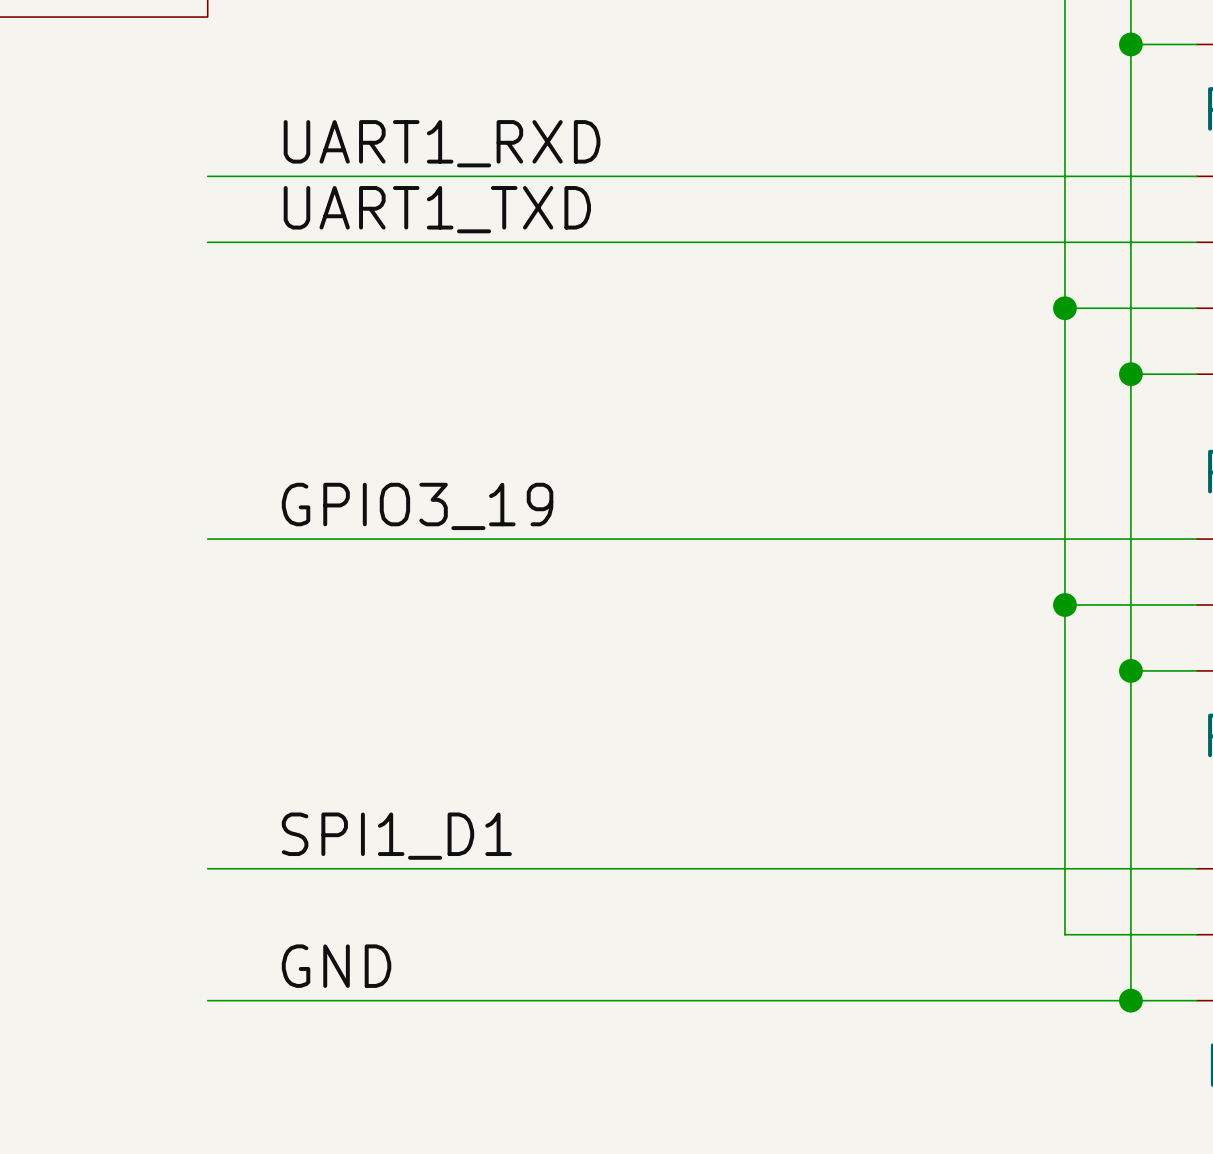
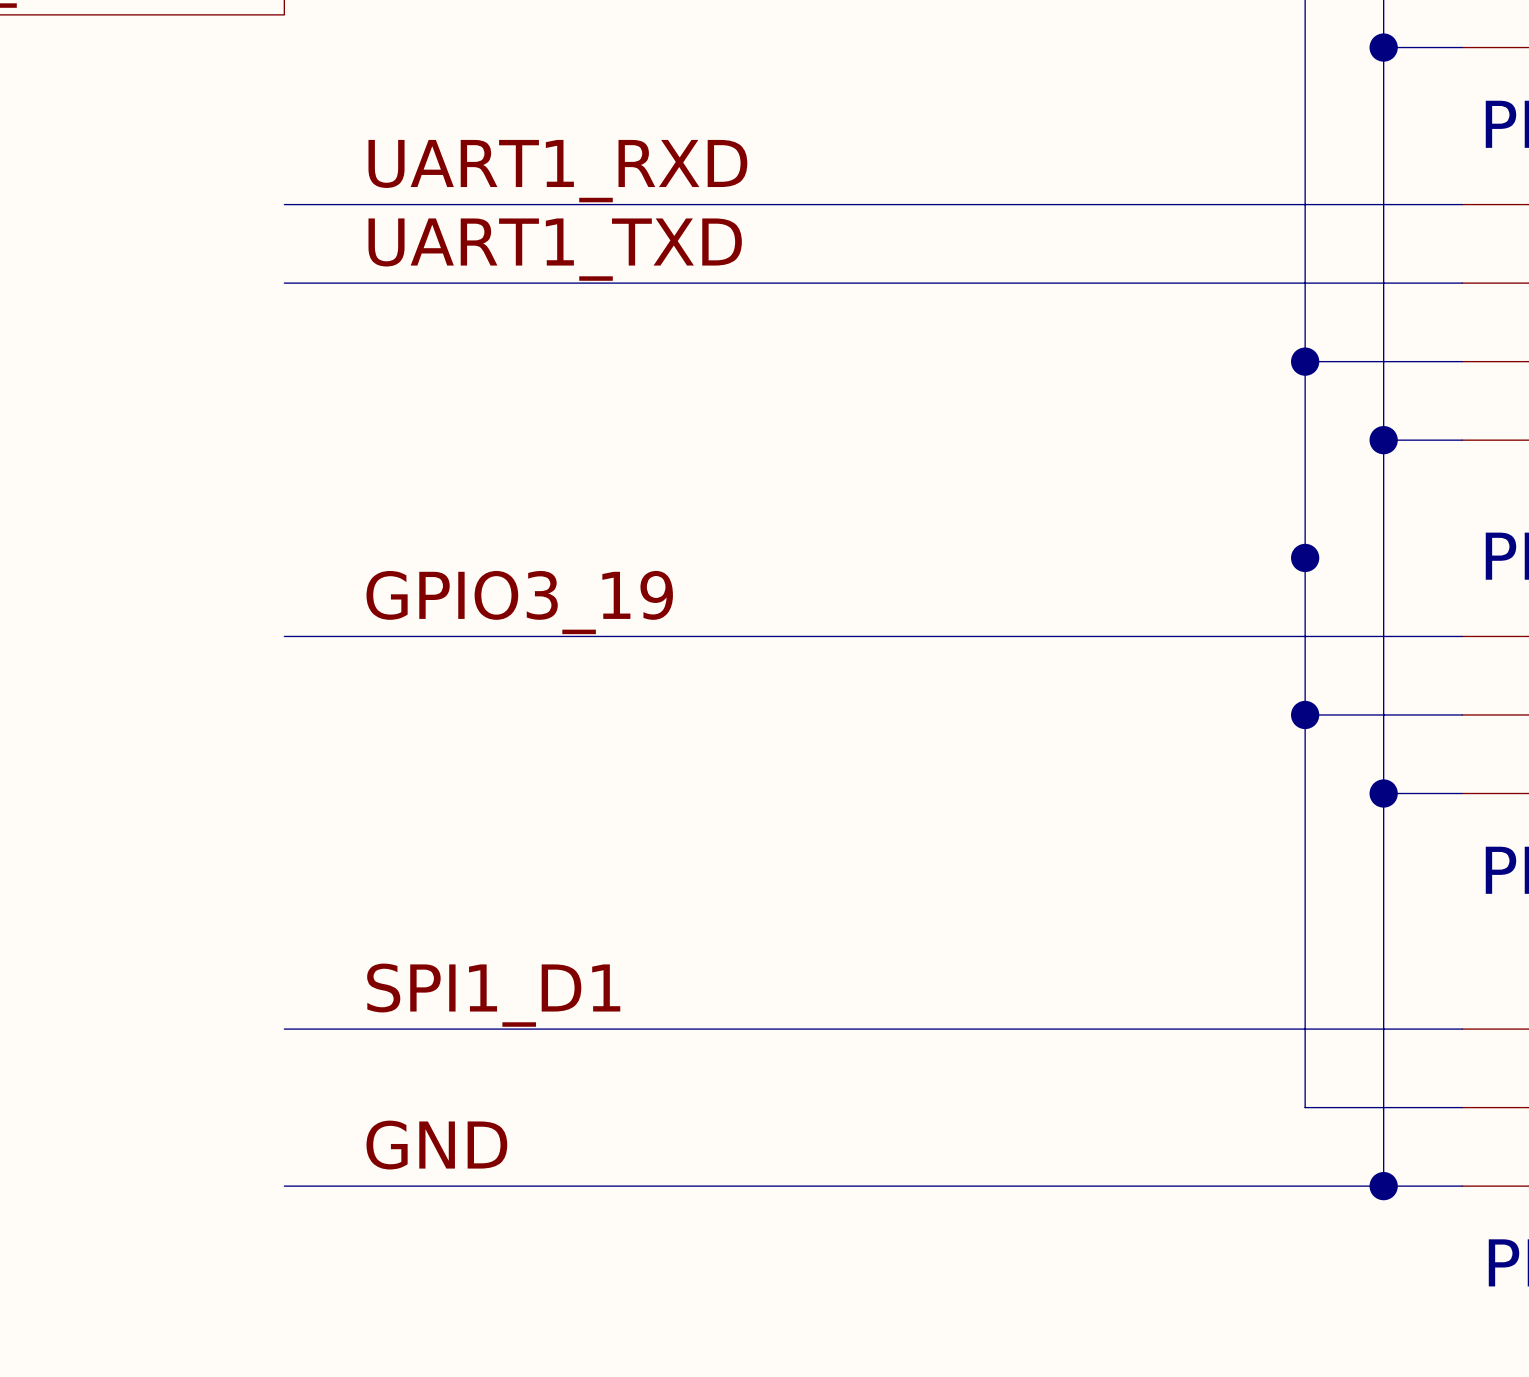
junction: none -> (1305, 557)

